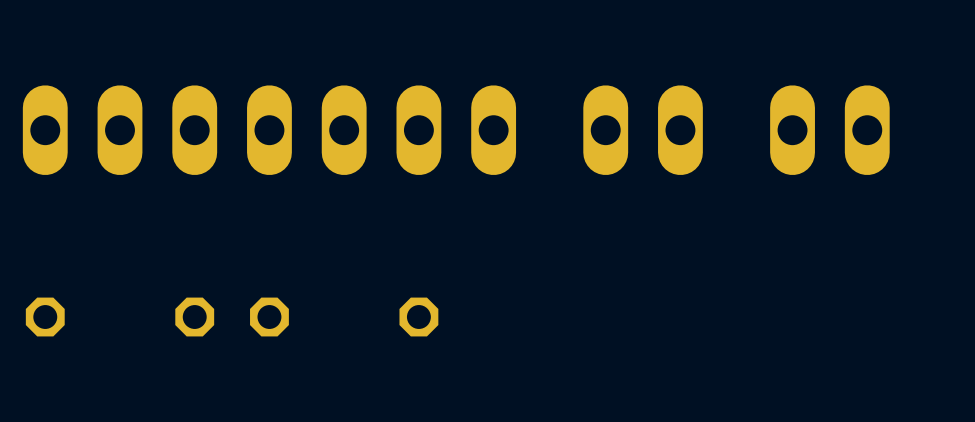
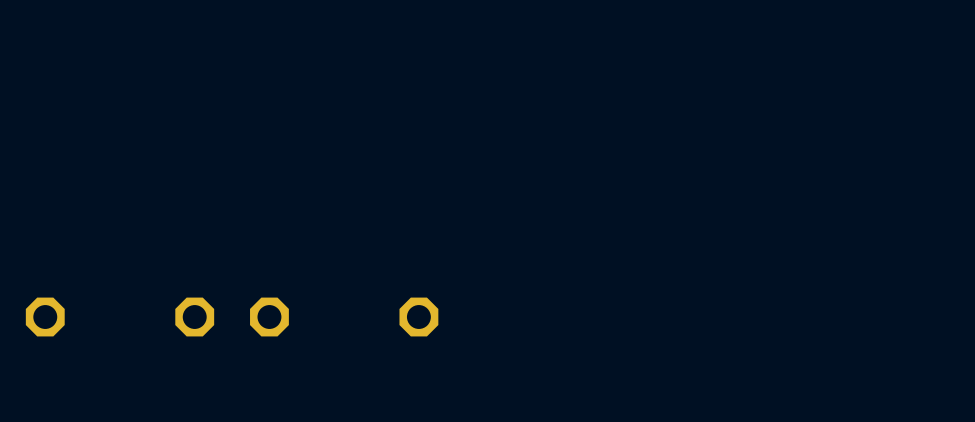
part: (269, 130) -> none
part: (643, 130) -> none
part: (829, 130) -> none

